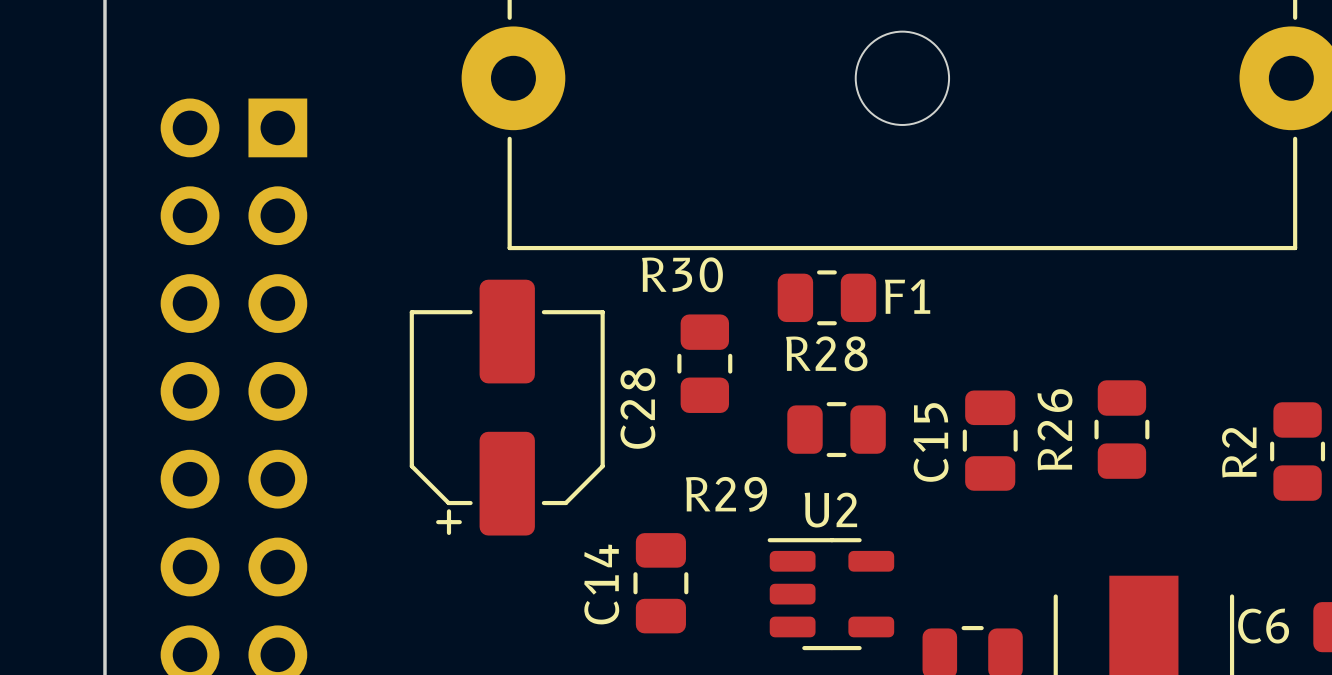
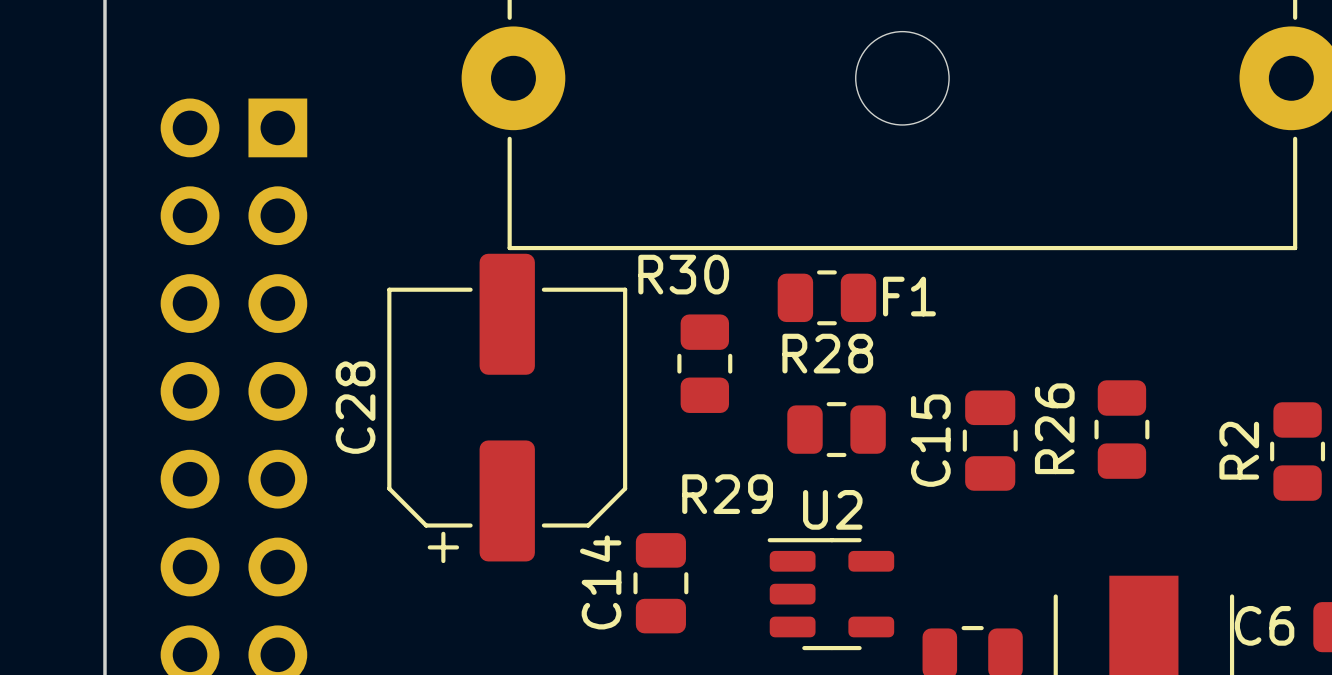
C28 footprint: [409, 279, 605, 536] -> [387, 253, 628, 564]
C28 name position: C28 (637, 408) -> C28 (355, 407)

